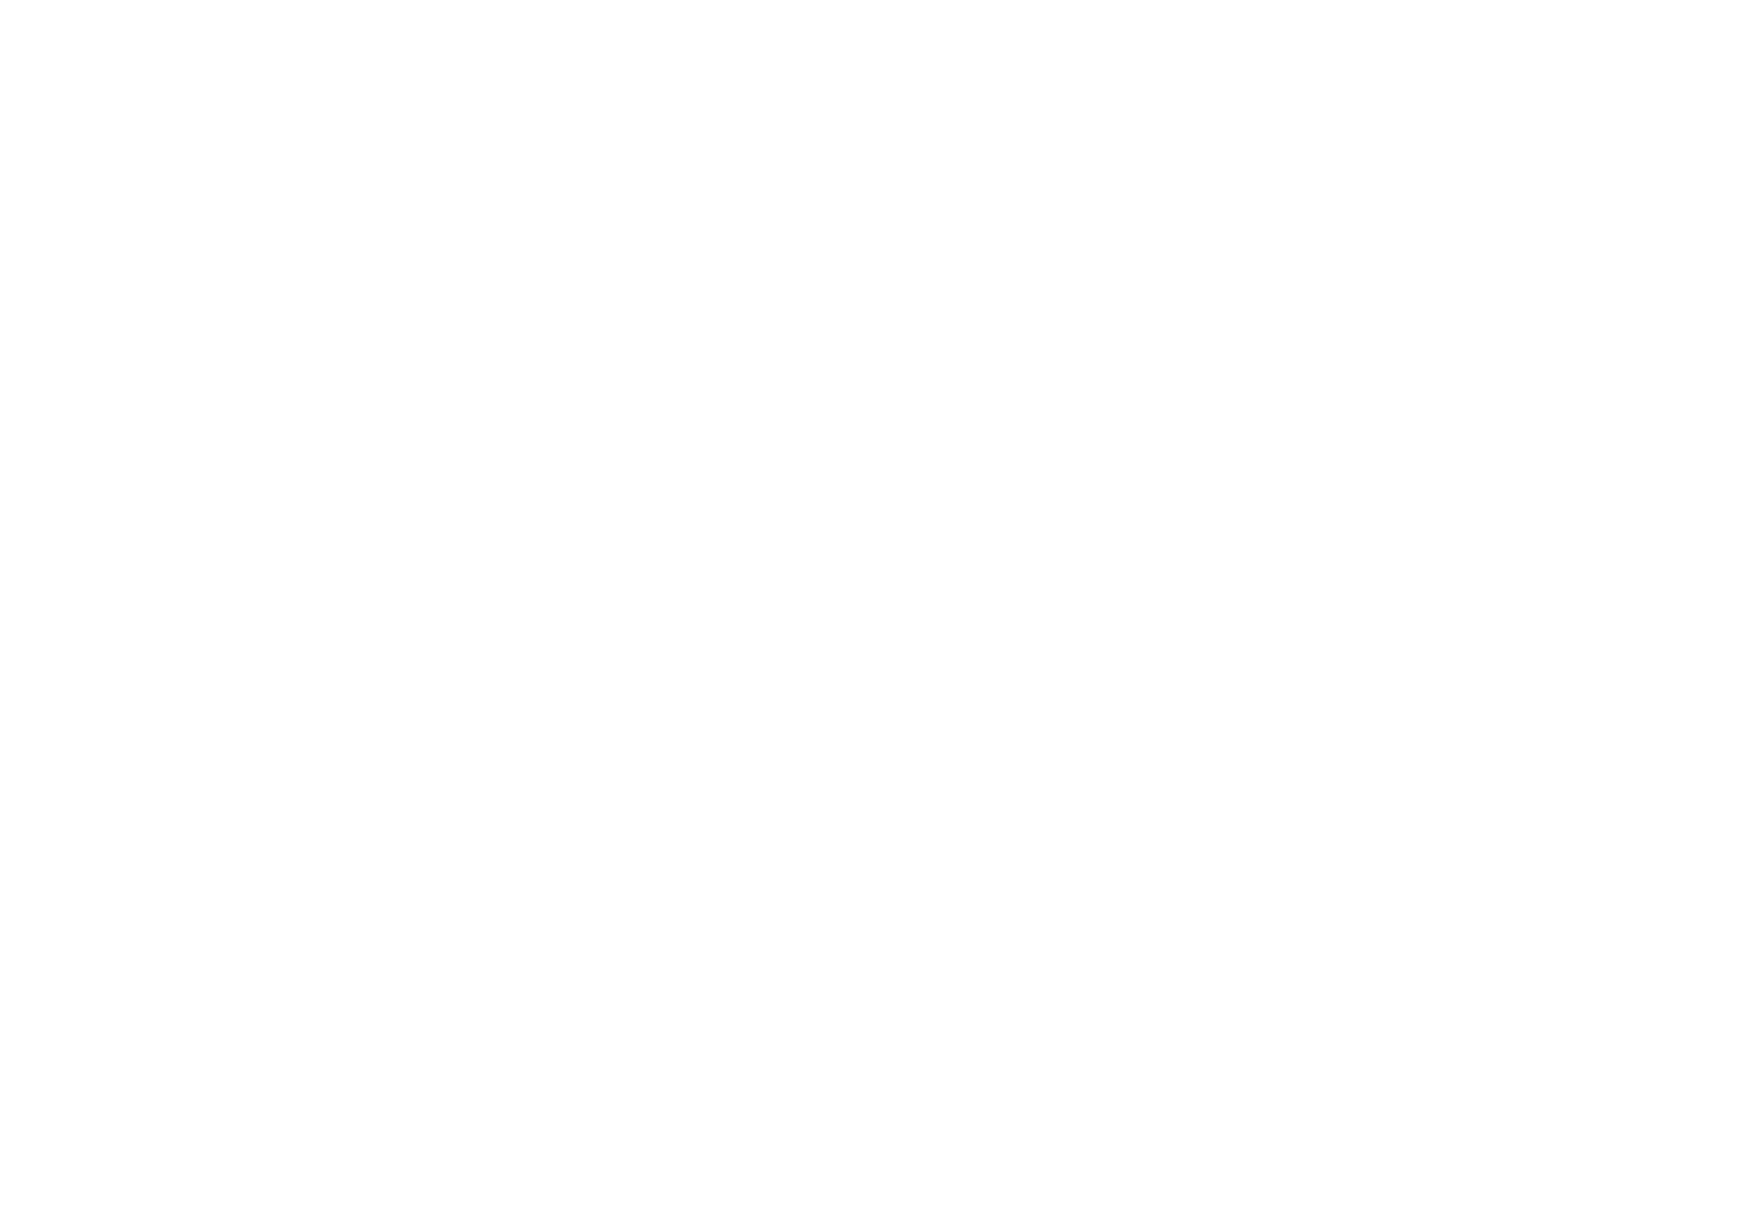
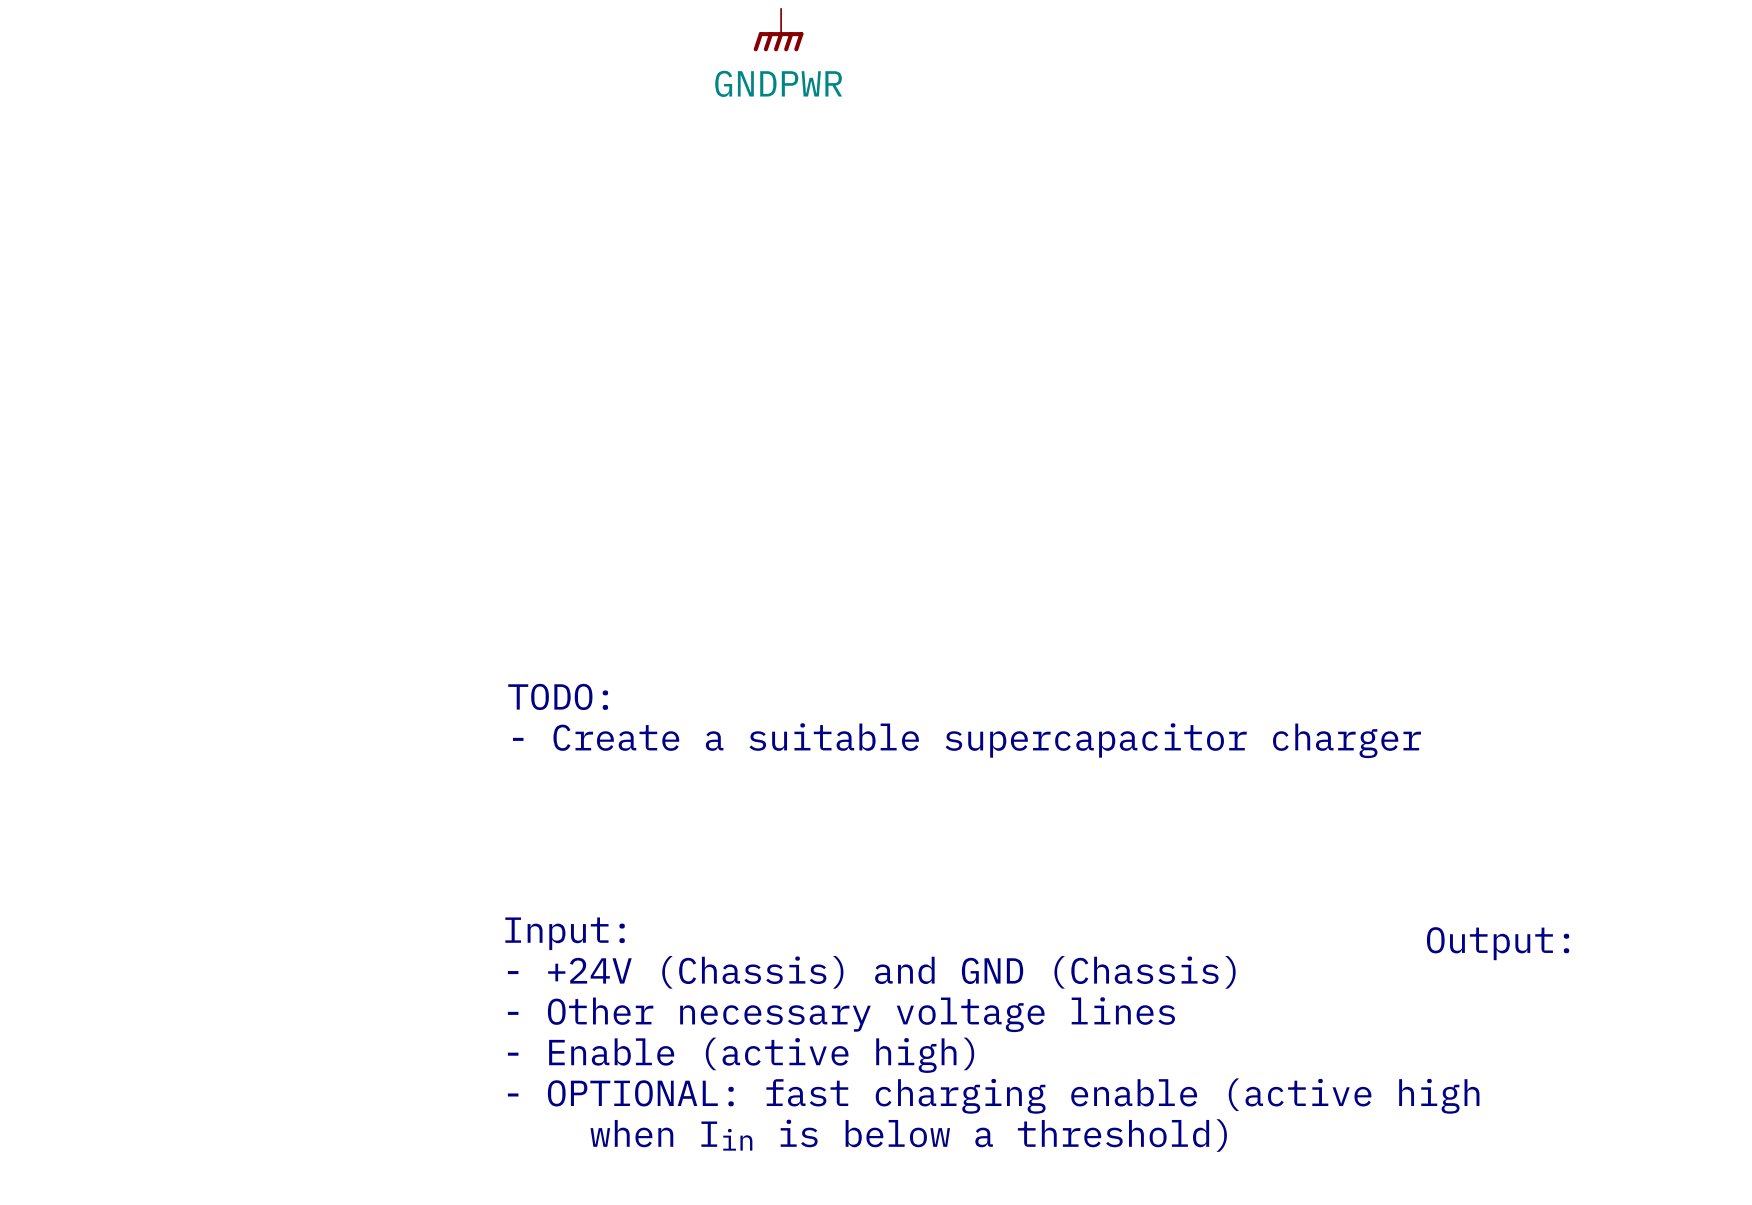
power symbol: none -> GNDPWR (778, 30)
text: none -> TODO: (558, 696)
text: none -> - Create a suitable supercapacitor charger (966, 740)
text: none -> Input: (565, 933)
text: none -> Output: (1498, 943)
text: none -> - +24V (Chassis) and GND (Chassis) (871, 972)
text: none -> - Other necessary voltage lines (841, 1014)
text: none -> - Enable (active high) (741, 1055)
text: none -> - OPTIONAL: fast charging enable (active high (993, 1096)
text: none -> when Iin is below a threshold) (908, 1135)

